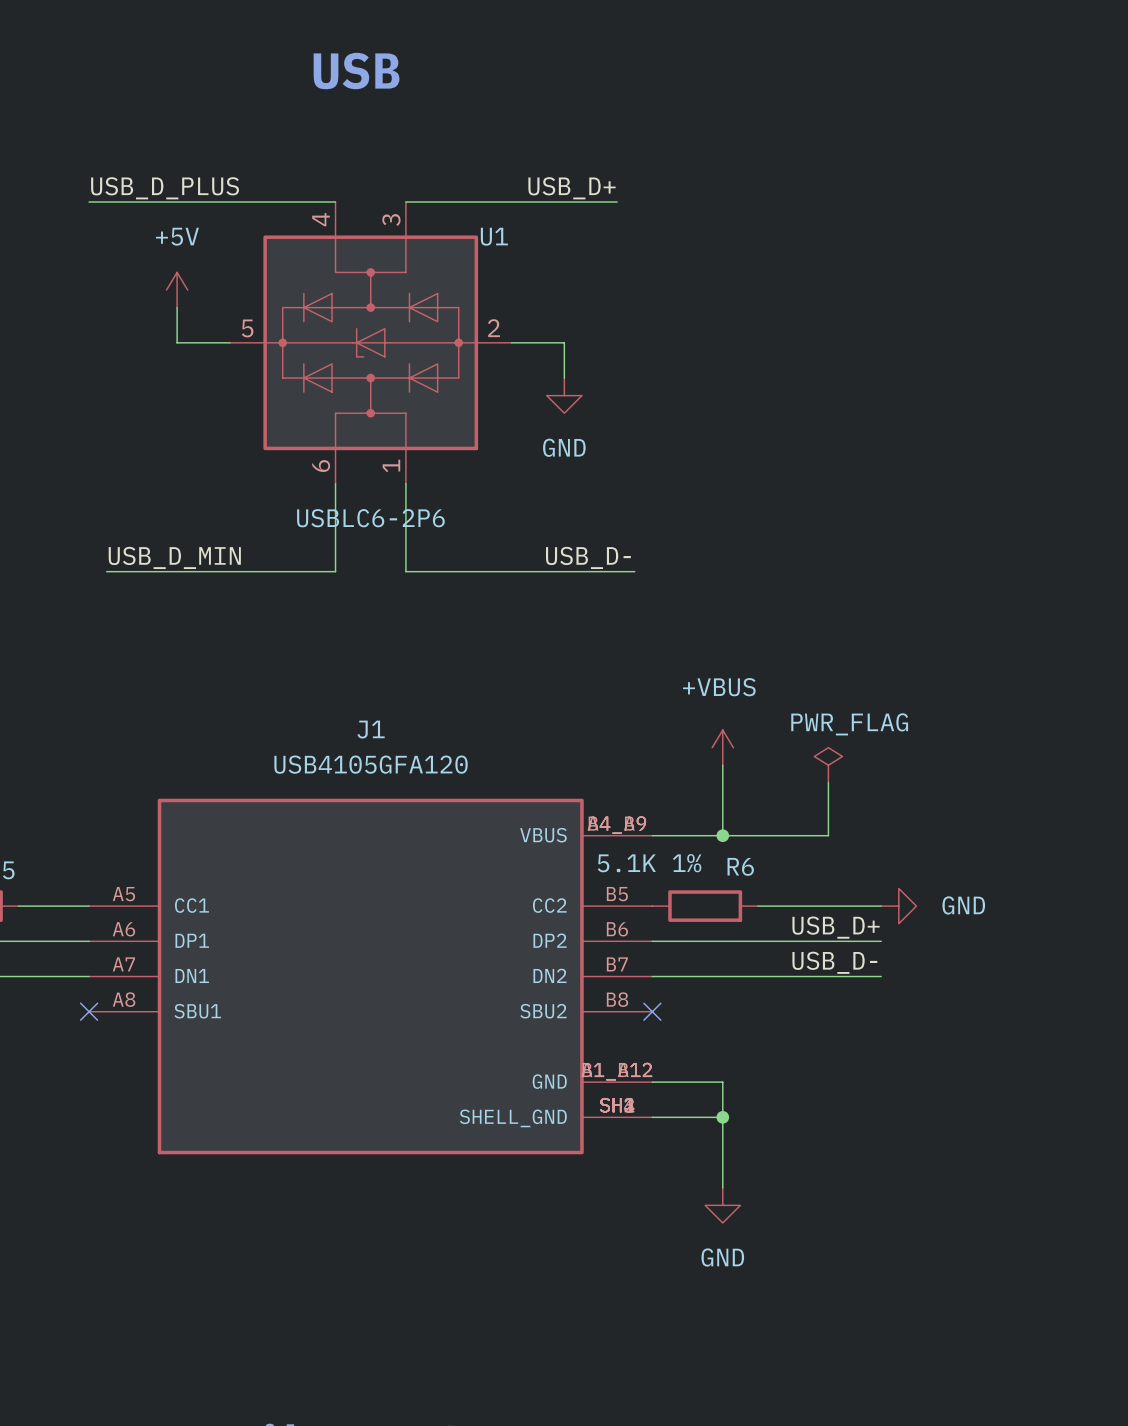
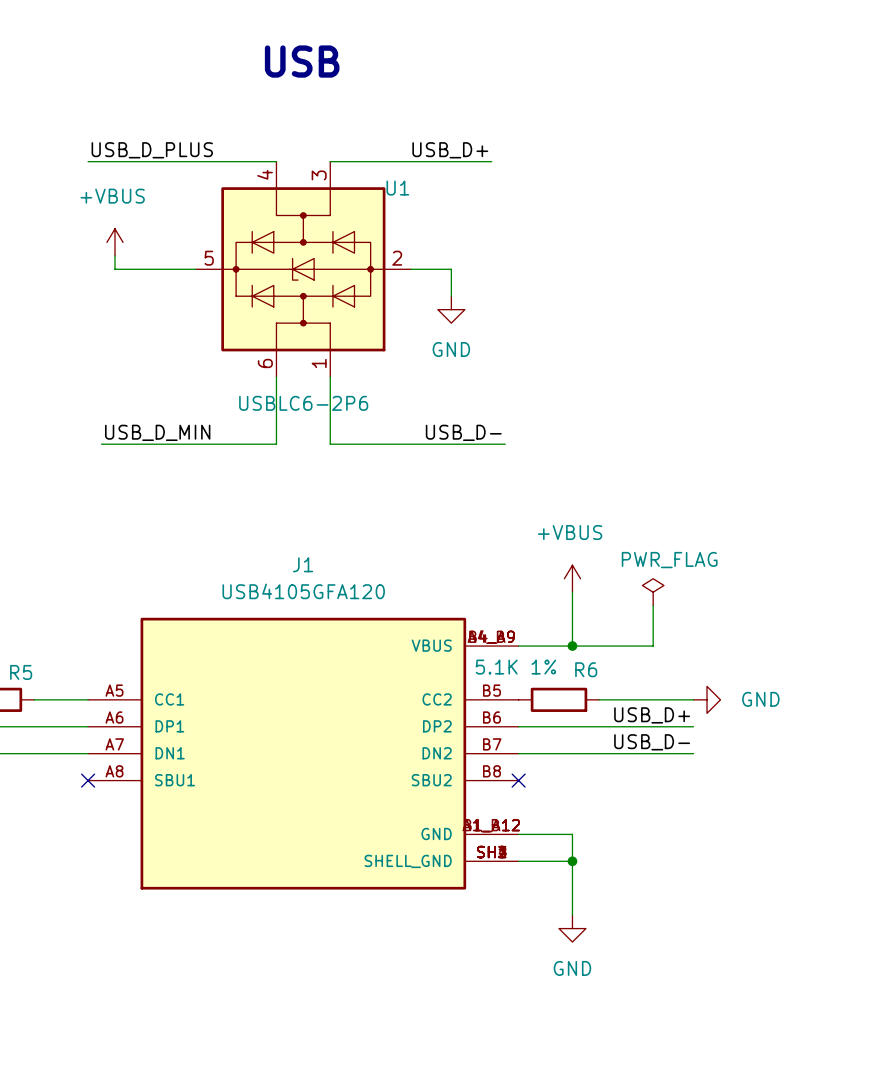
power symbol: +5V (177, 290) -> none
power symbol: none -> +VBUS (114, 242)
wire: (177, 307) (177, 342) -> (114, 255) (114, 269) (155, 269)

